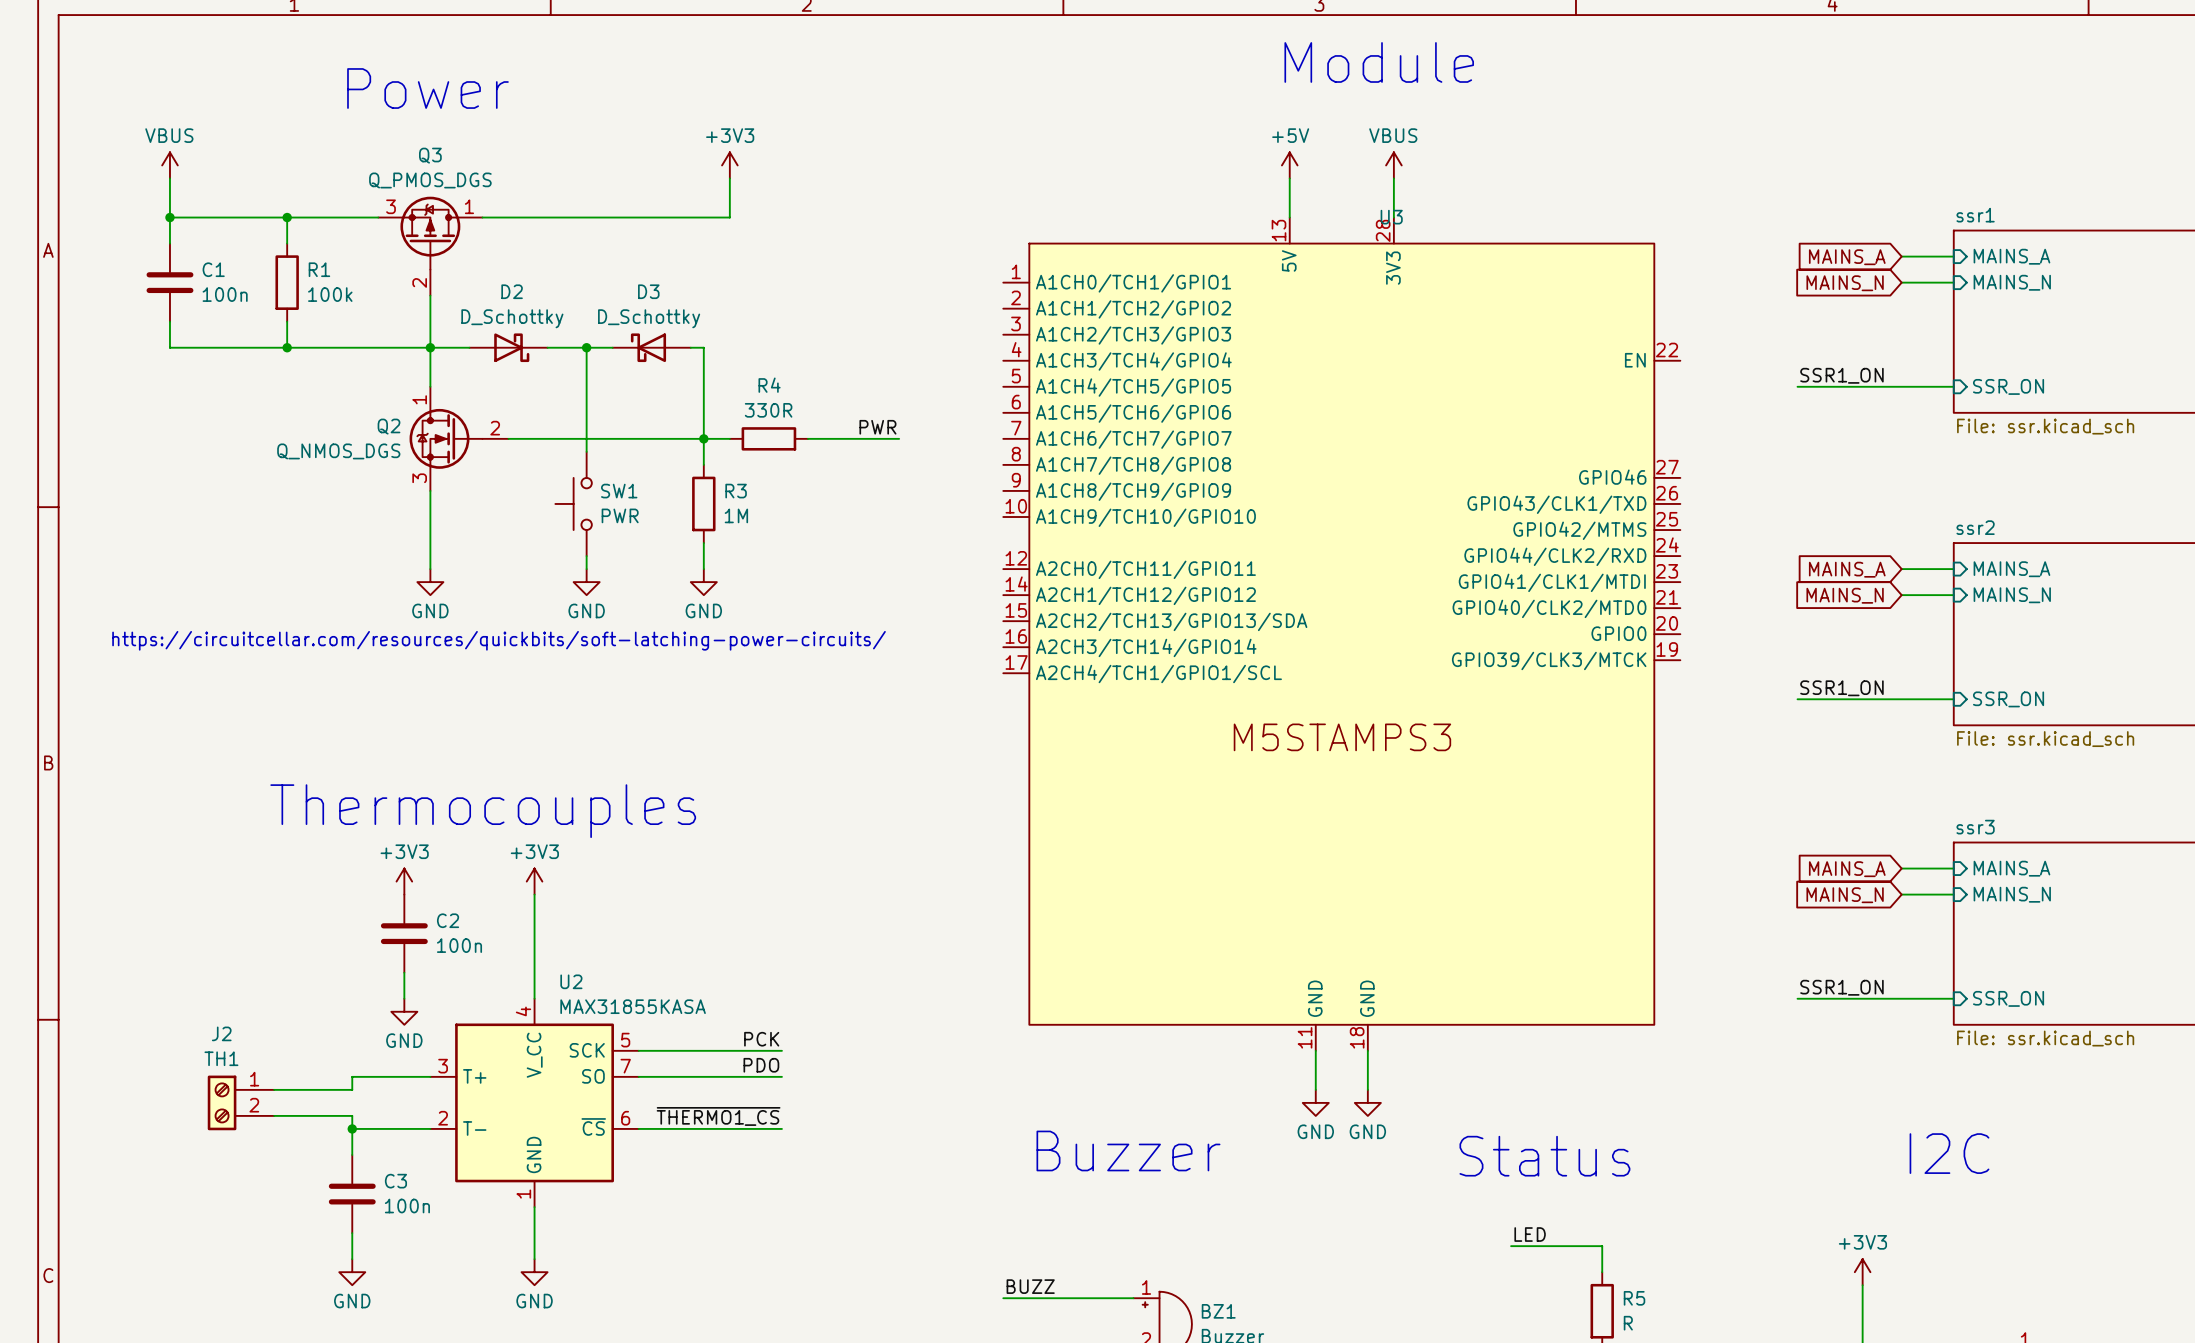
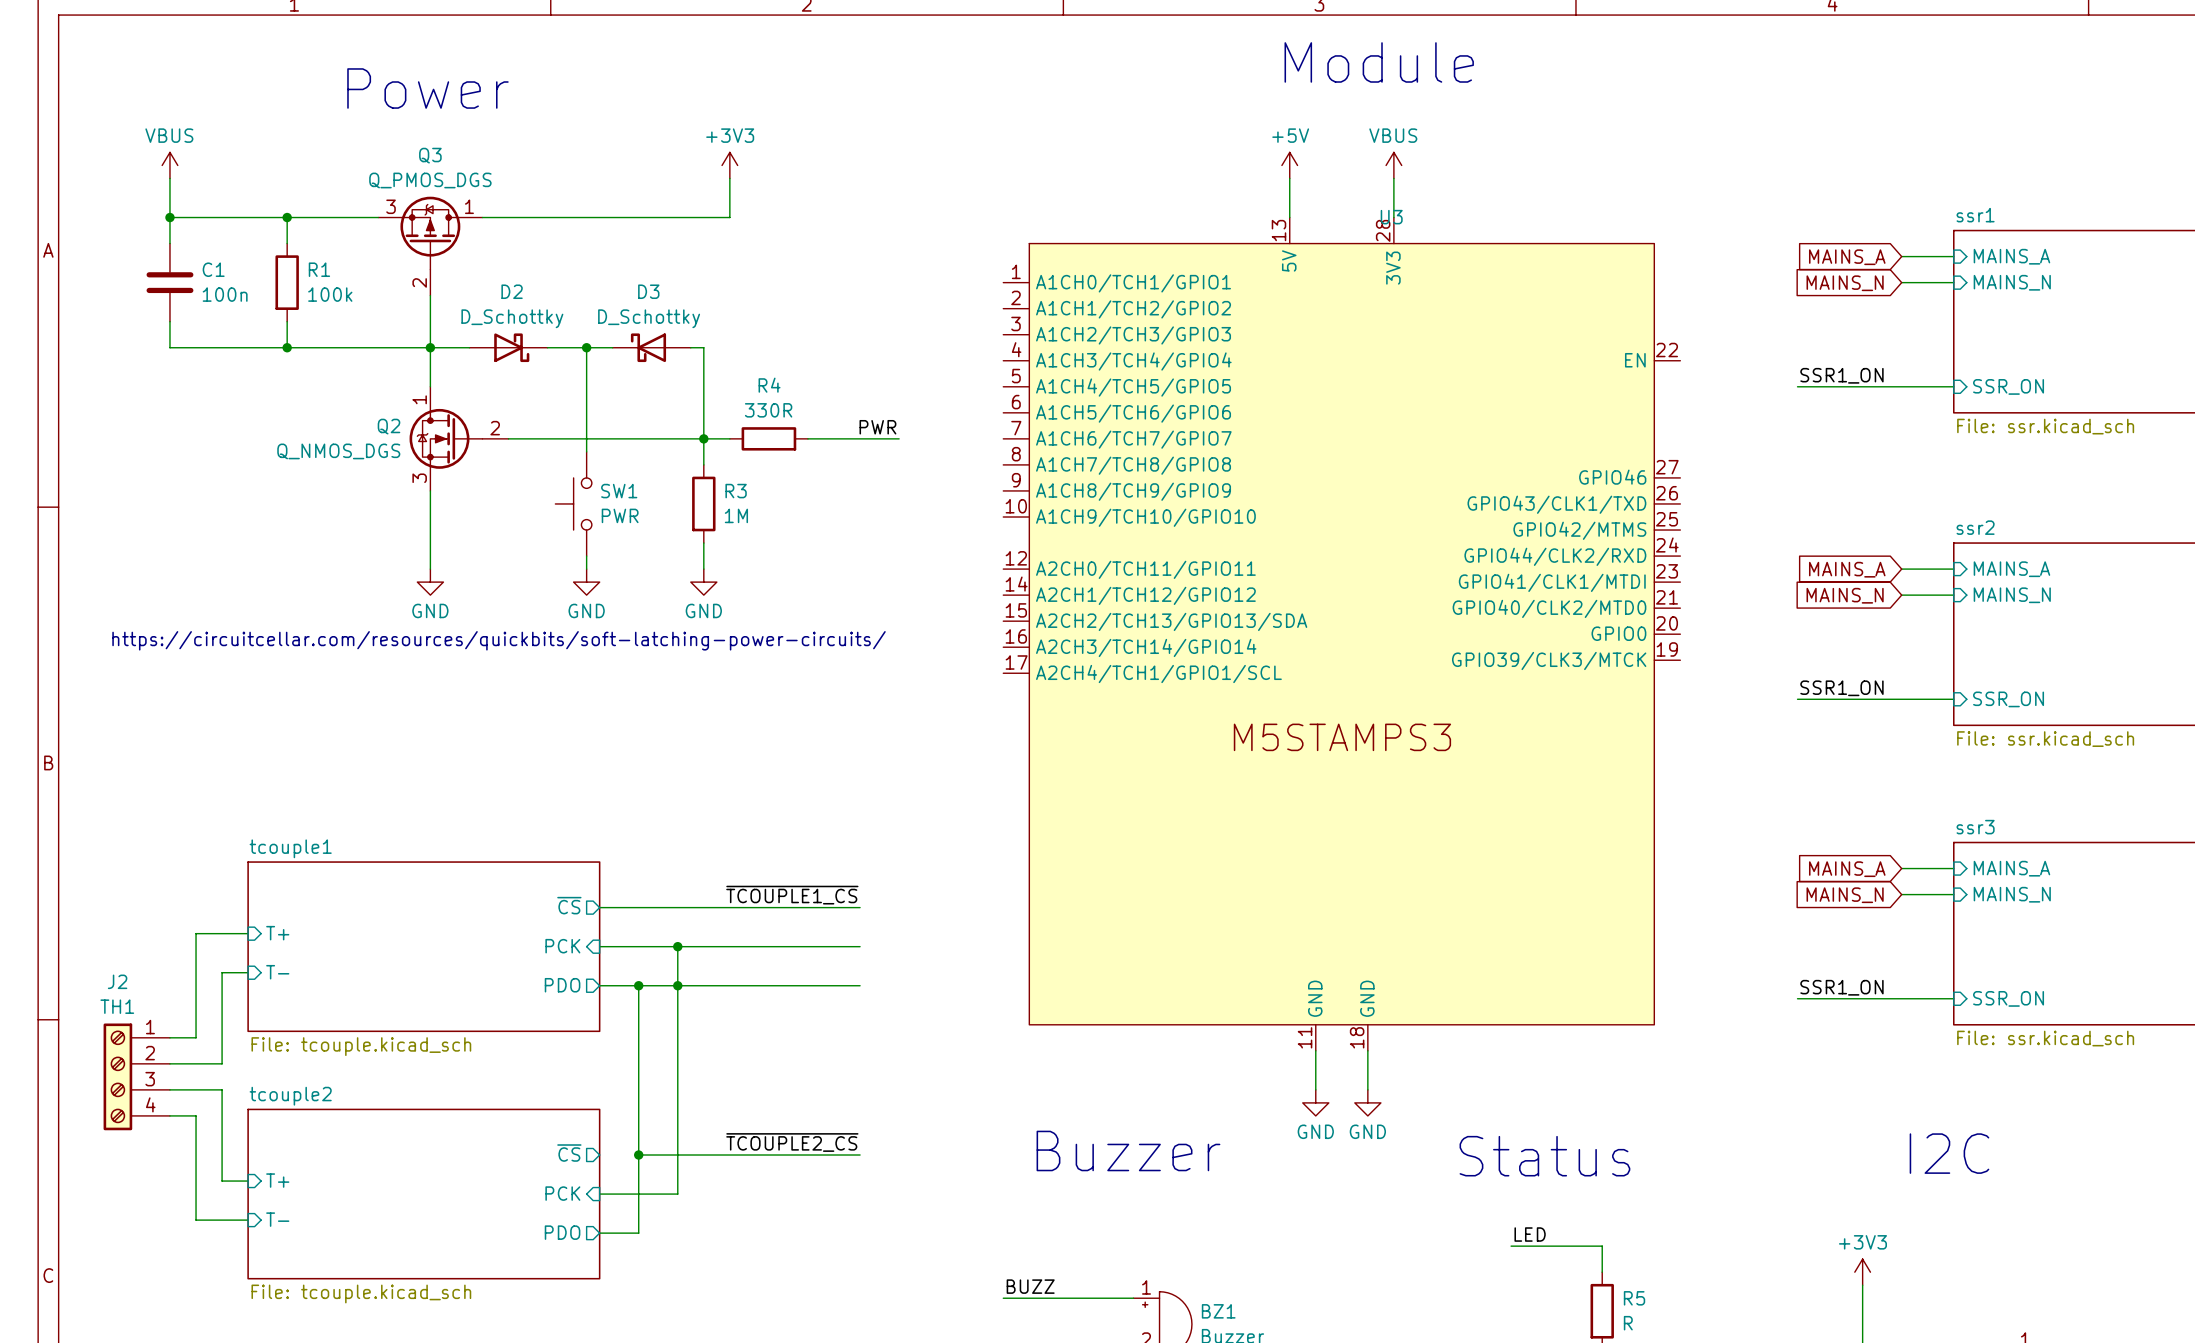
text: Thermocouples (483, 811) -> none
power symbol: +3V3 (404, 881) -> none
power symbol: +3V3 (534, 881) -> none
wire: (534, 894) (534, 998) -> none
label: none -> ~{TCOUPLE1_CS} (792, 895)
sheet pin: none -> ~{CS} (569, 905)
wire: none -> (599, 907) (860, 907)
wire: none -> (248, 933) (196, 933) (196, 1037) (169, 1037)
sheet pin: none -> T+ (277, 933)
C2: 100n (404, 933) -> none
sheet tcouple1: none -> File: tcouple.kicad_sch (423, 946)
sheet pin: none -> PCK (562, 946)
wire: none -> (599, 946) (860, 946)
wire: none -> (677, 946) (677, 1194) (599, 1194)
junction: none -> (677, 946)
wire: none -> (248, 972) (222, 972) (222, 1063) (169, 1063)
sheet pin: none -> T- (277, 972)
wire: (404, 972) (404, 998) -> none
sheet pin: none -> PDO (562, 985)
wire: none -> (599, 985) (860, 985)
wire: none -> (638, 985) (638, 1233) (599, 1233)
junction: none -> (638, 985)
junction: none -> (677, 985)
power symbol: GND (404, 1011) -> none
J2 name position: J2 (221, 1033) -> J2 (117, 981)
label: PCK (761, 1039) -> none
wire: (638, 1050) (781, 1050) -> none
J2 value position: TH1 (221, 1058) -> TH1 (117, 1006)
label: PDO (761, 1065) -> none
J2 symbol: [207, 1075, 275, 1131] -> [103, 1023, 170, 1131]
wire: (430, 1076) (352, 1076) (352, 1089) (274, 1089) -> none
wire: (638, 1076) (781, 1076) -> none
wire: none -> (169, 1089) (222, 1089) (222, 1181) (248, 1181)
U2: MAX31855KASA (534, 1102) -> none
wire: none -> (169, 1115) (196, 1115) (196, 1220) (248, 1220)
wire: (274, 1115) (352, 1115) (352, 1155) -> none
label: ~{THERMO1_CS} (718, 1116) -> none
wire: (352, 1128) (430, 1128) -> none
junction: (352, 1128) -> none
wire: (638, 1128) (781, 1128) -> none
label: none -> ~{TCOUPLE2_CS} (792, 1142)
sheet pin: none -> ~{CS} (569, 1153)
wire: none -> (638, 1155) (860, 1155)
junction: none -> (638, 1155)
sheet pin: none -> T+ (277, 1180)
sheet pin: none -> PCK (562, 1193)
C3: 100n (352, 1194) -> none
sheet tcouple2: none -> File: tcouple.kicad_sch (423, 1194)
wire: (534, 1207) (534, 1259) -> none
sheet pin: none -> T- (277, 1219)
sheet pin: none -> PDO (562, 1232)
wire: (352, 1233) (352, 1259) -> none
power symbol: GND (352, 1272) -> none
power symbol: GND (534, 1272) -> none

